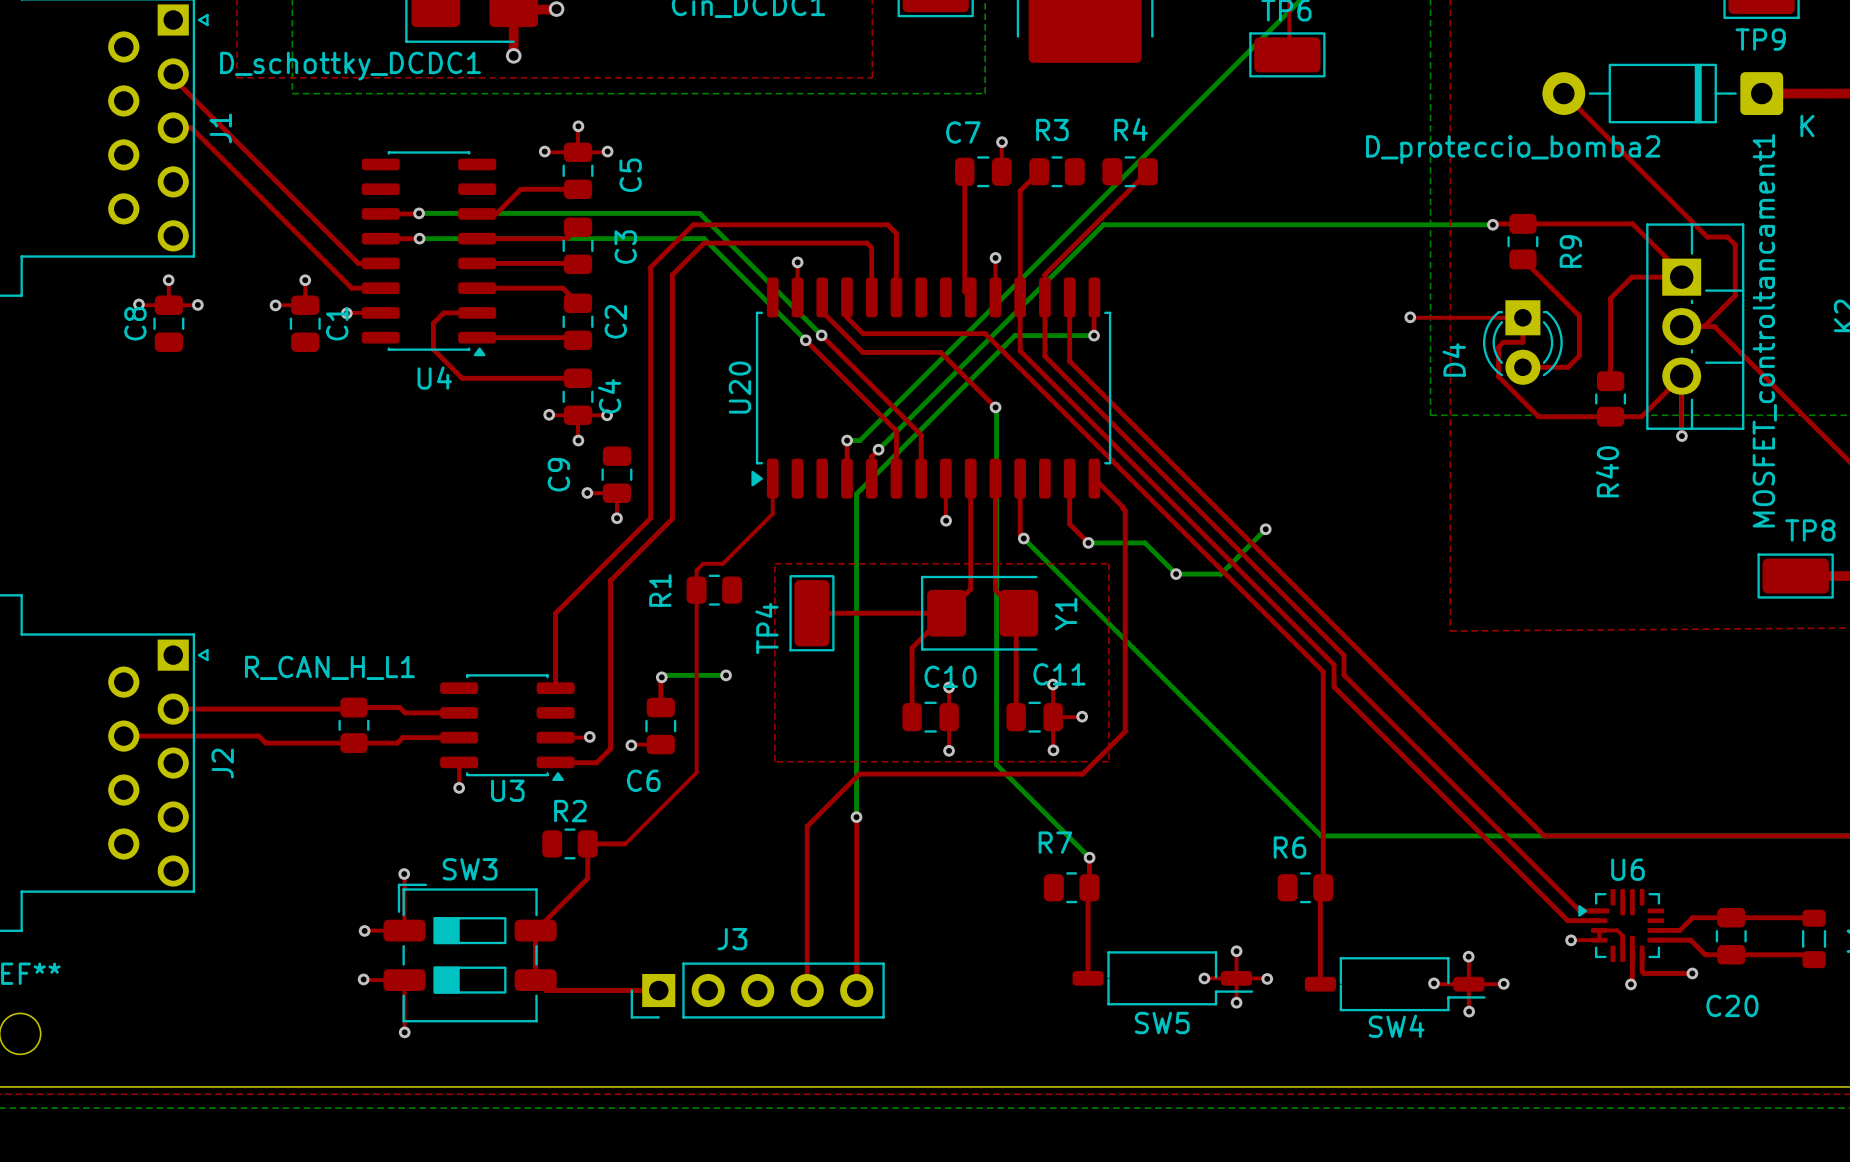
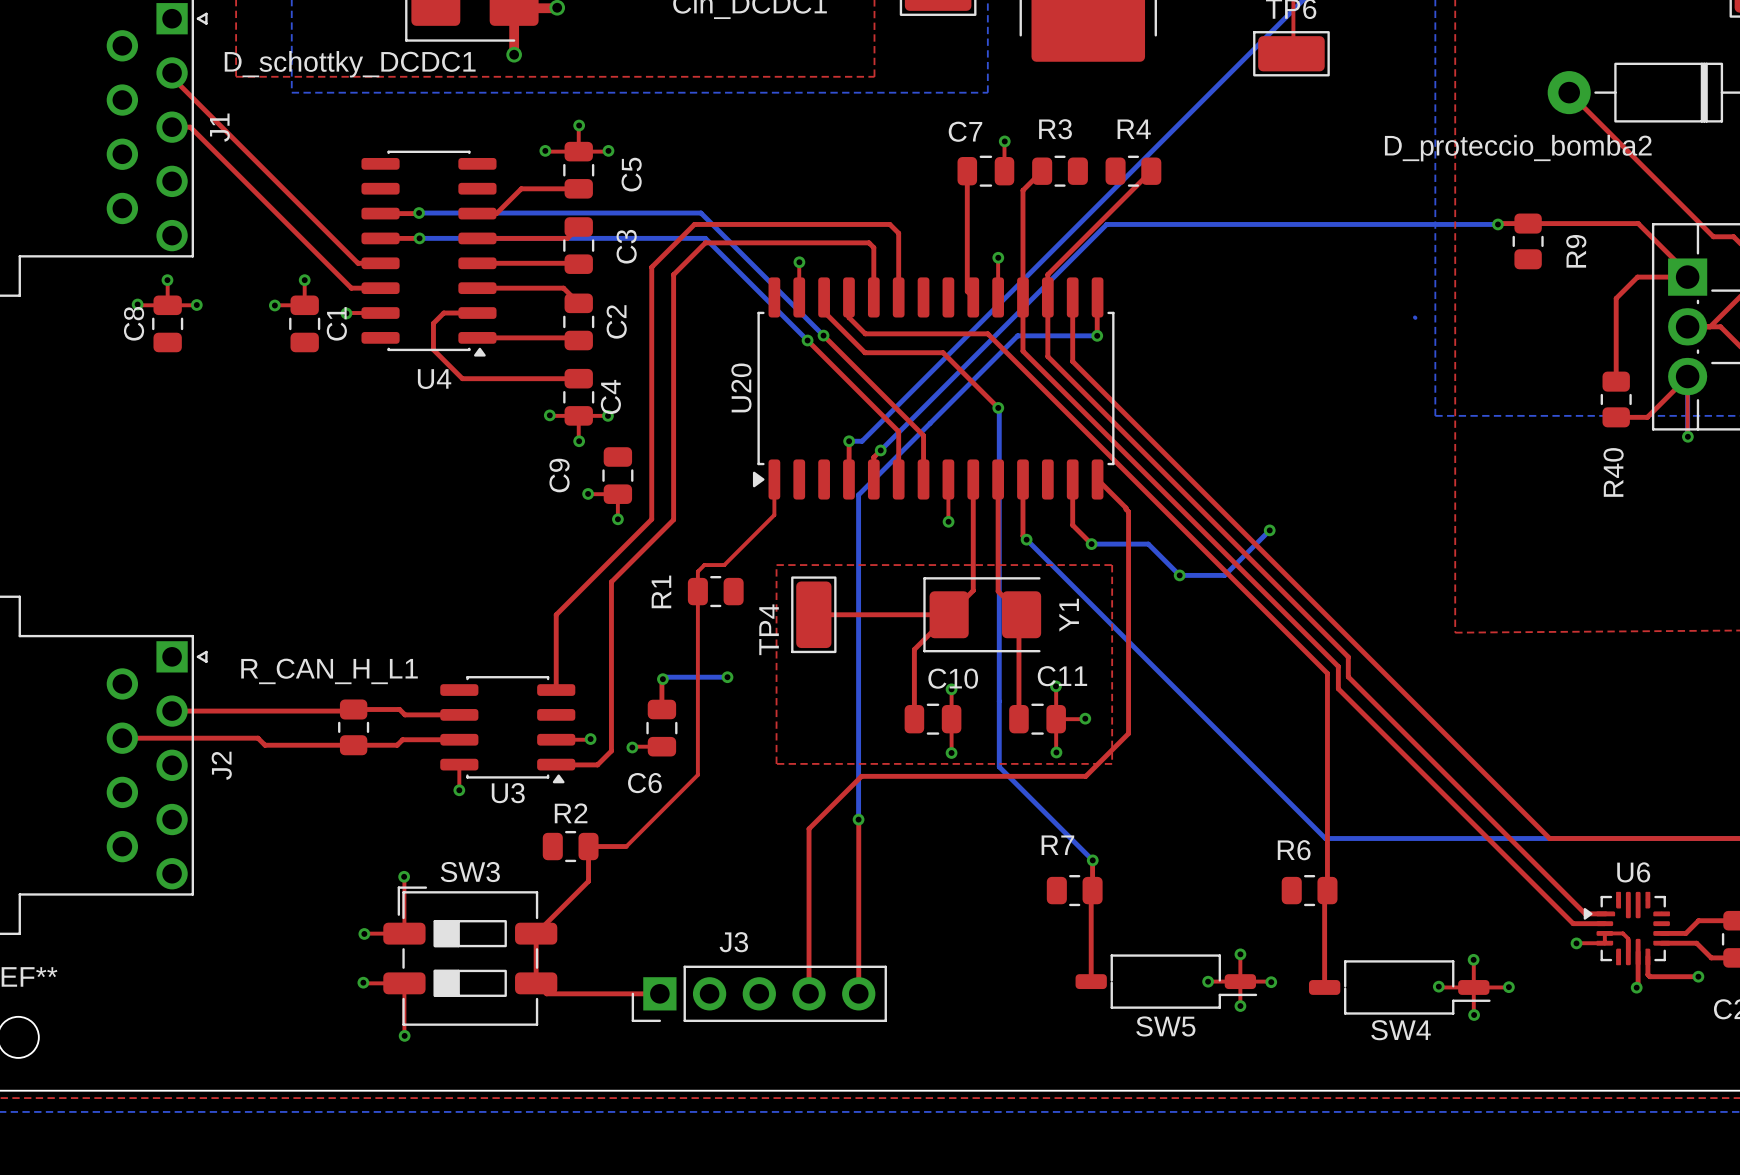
top track: (1522, 259) (1579, 315) (1579, 355) (1568, 367) (1522, 367) -> none
top track: (1410, 317) (1522, 317) (1522, 342) (1503, 342) (1498, 347) (1498, 376) (1538, 416) (1610, 416) -> none
via: (1410, 317) -> none
D4: (1522, 342) -> none

